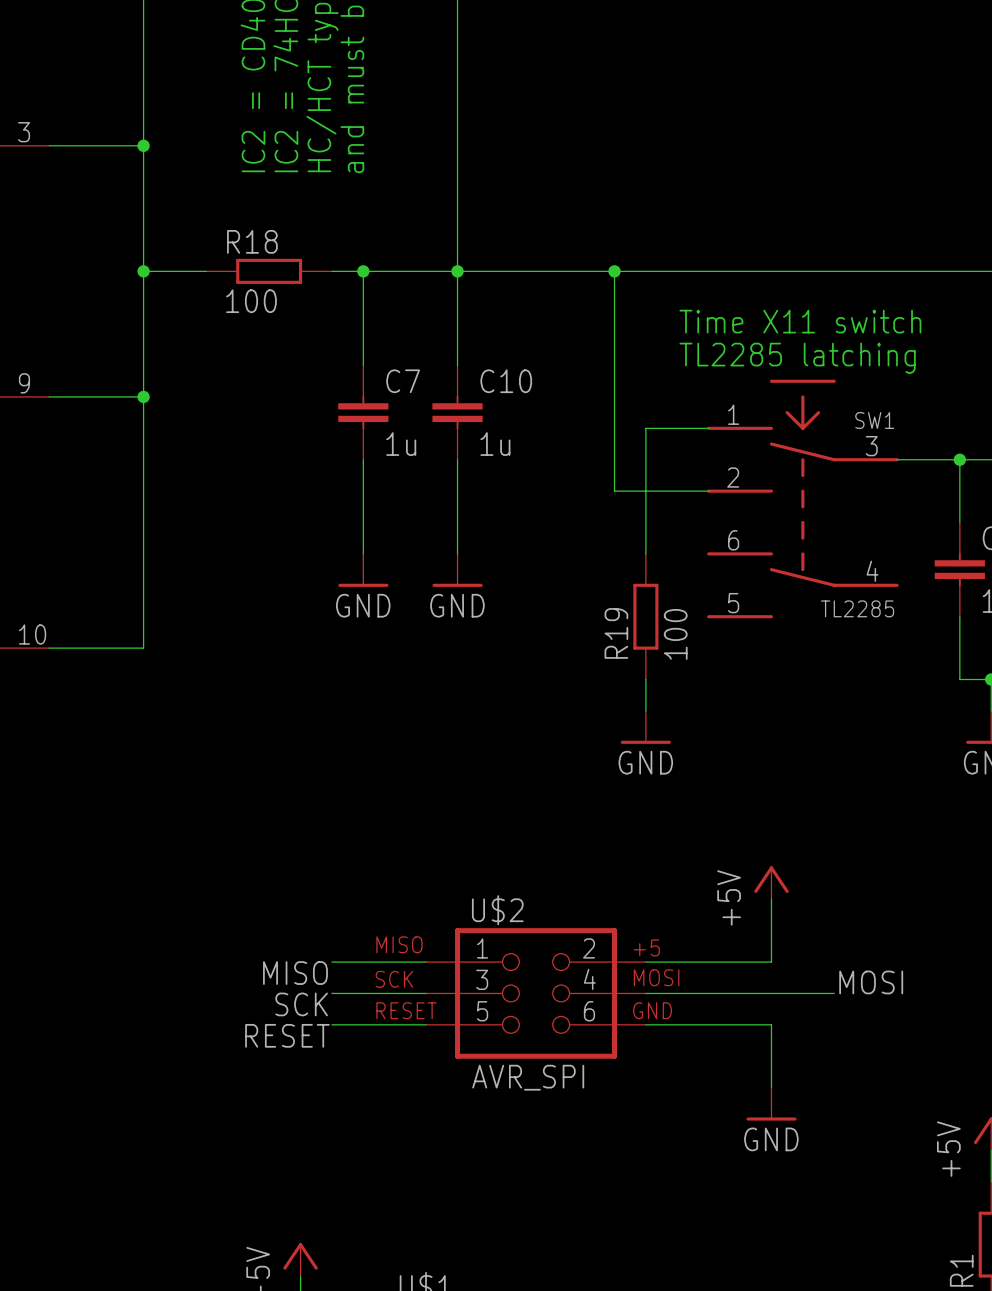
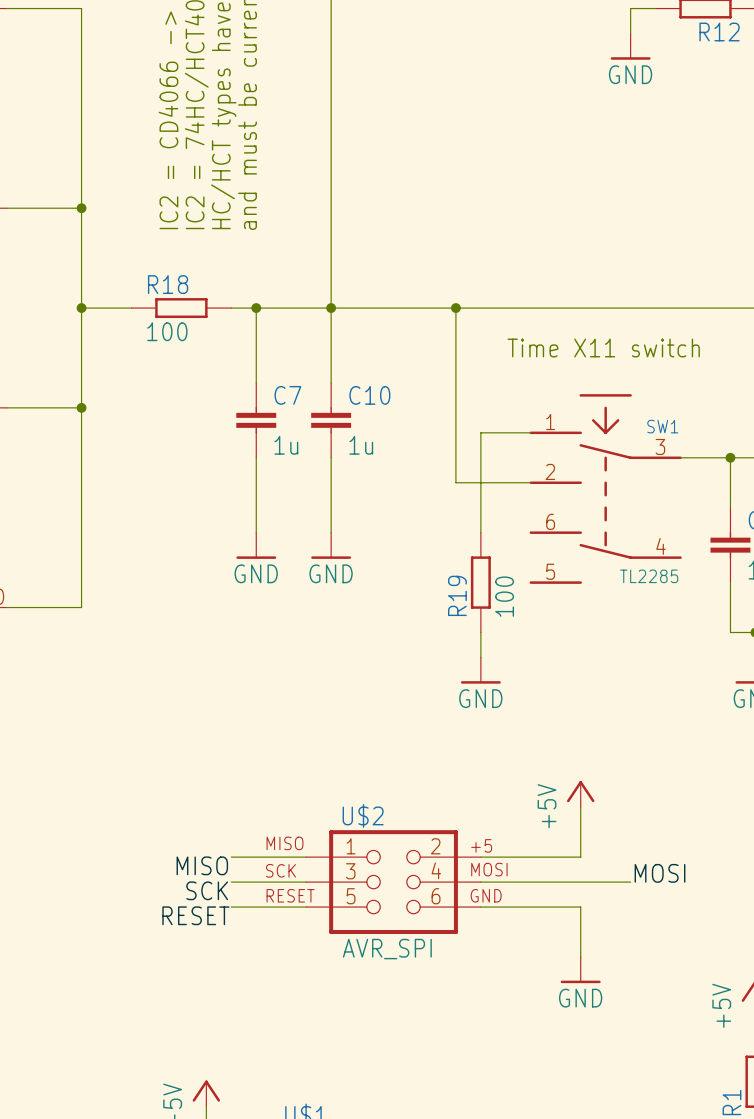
text: TL2285 latching (797, 358) -> none

